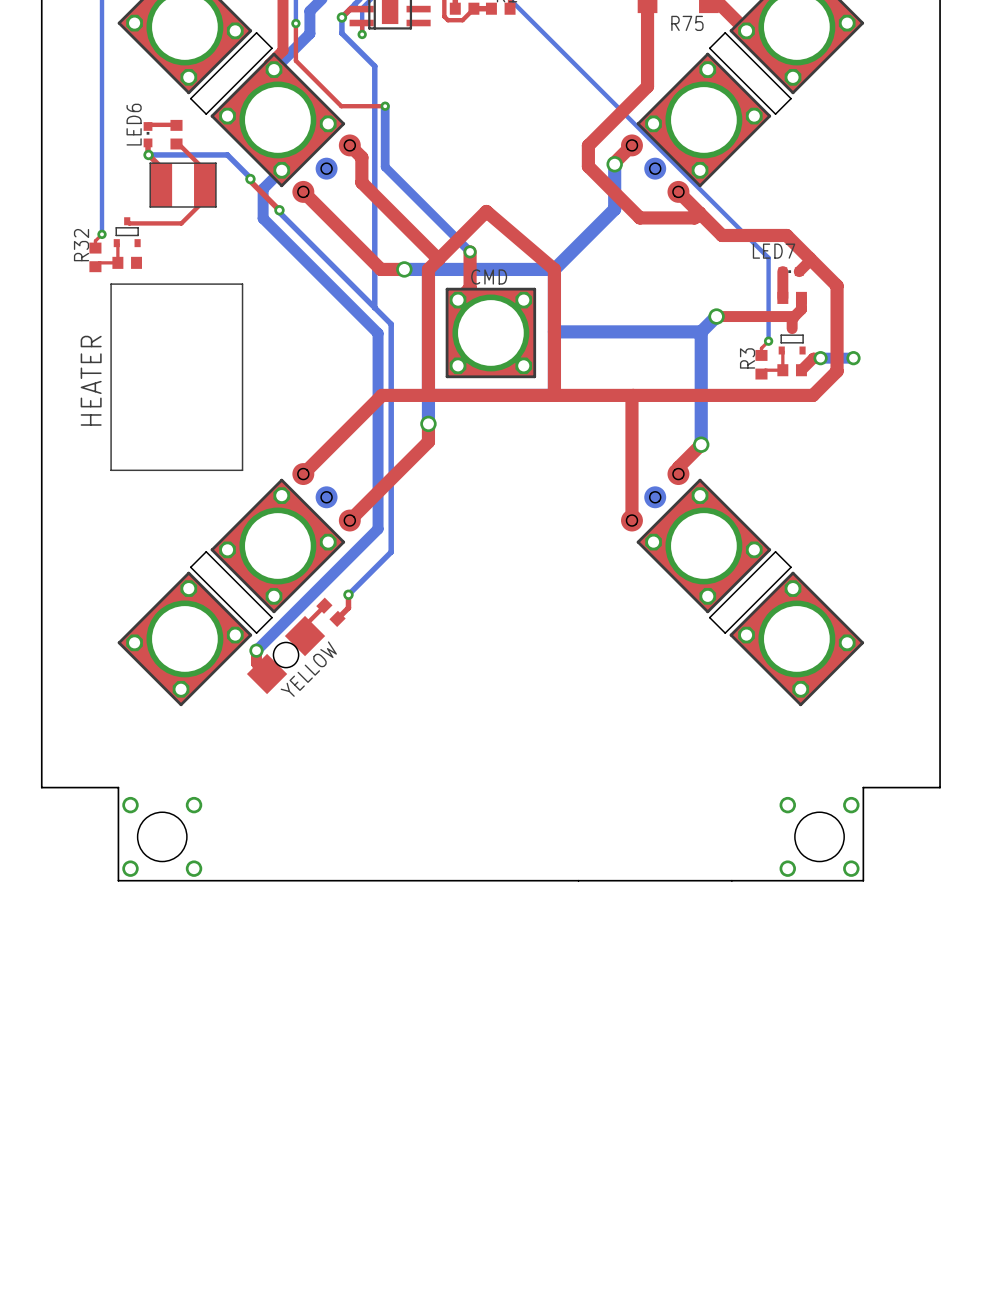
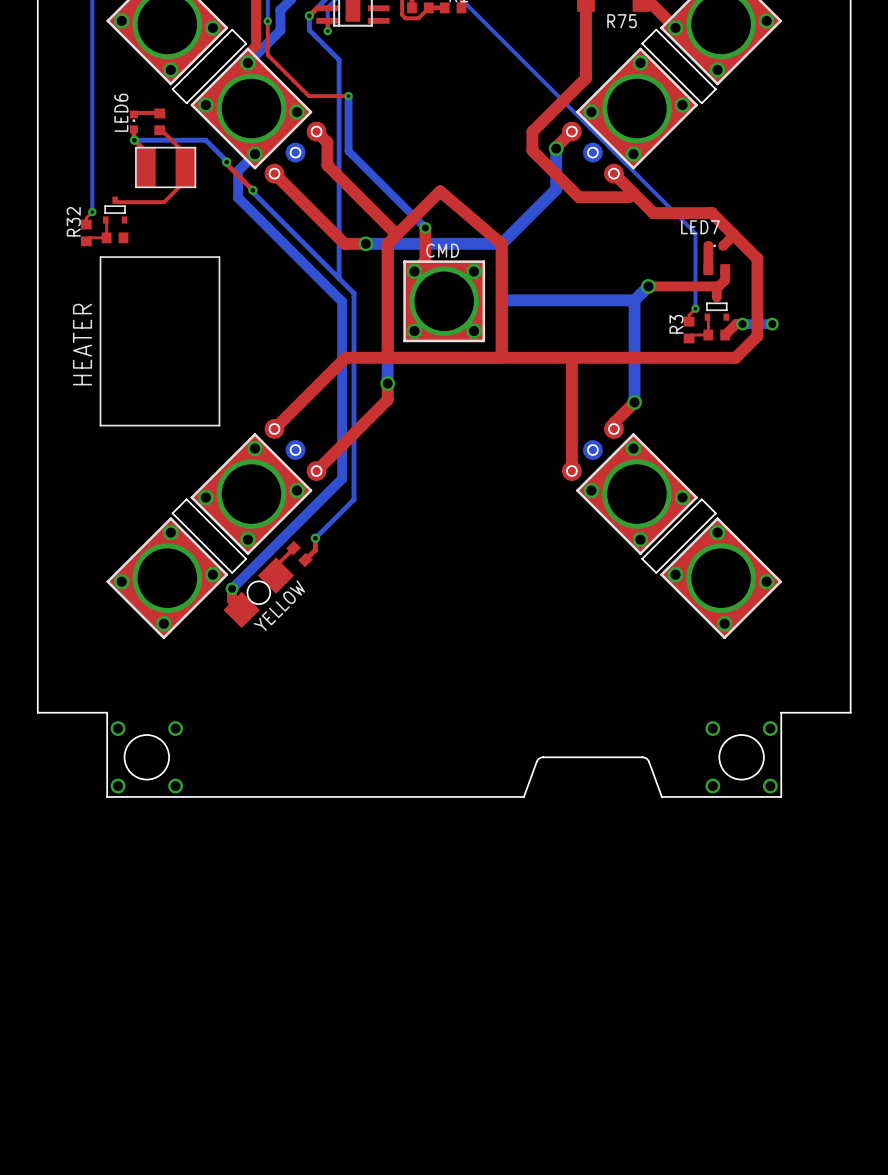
board edge: (578, 880) (731, 880) -> (523, 796) (537, 761) (543, 757) (645, 757) (649, 761) (661, 796)

